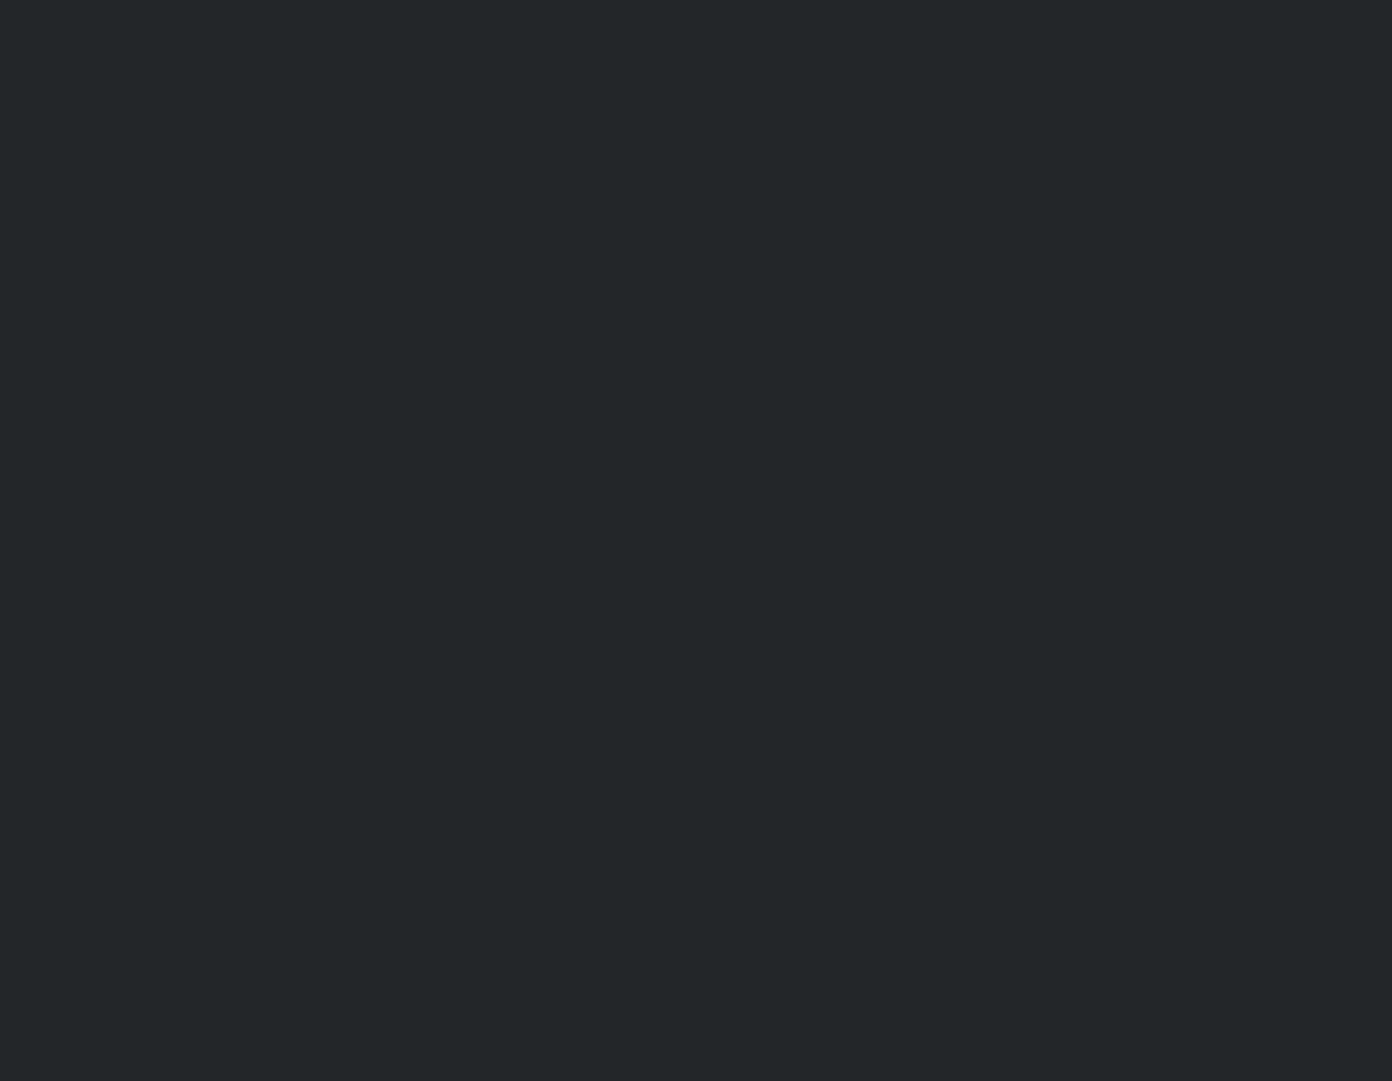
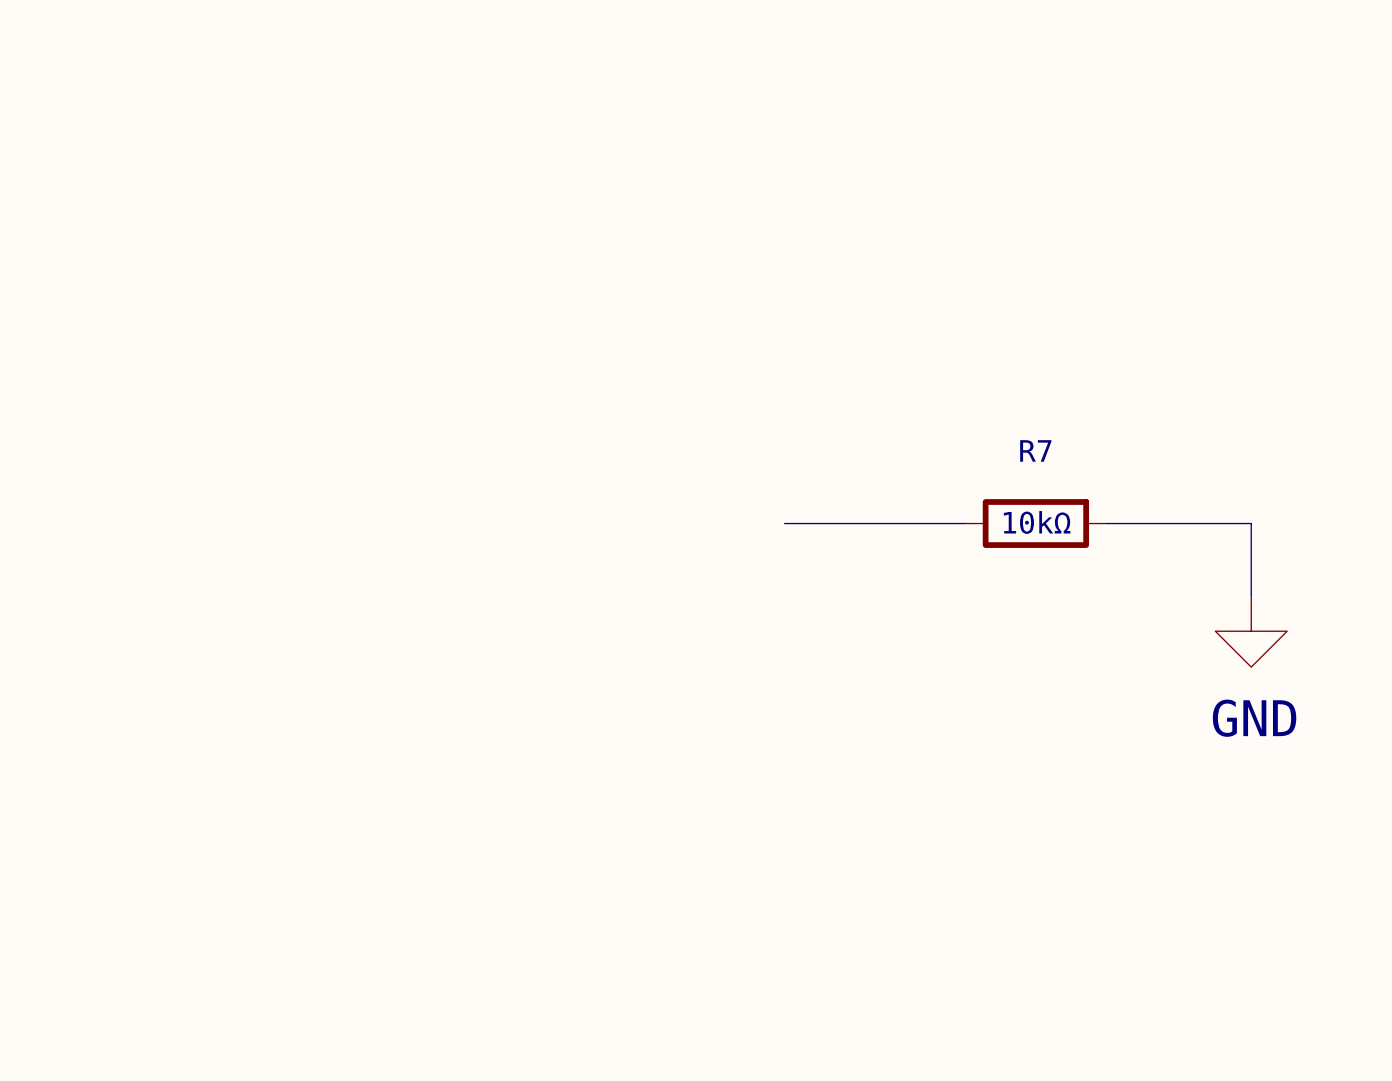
wire: none -> (784, 523) (964, 523)
R7: none -> 10kΩ (1035, 523)
wire: none -> (1107, 523) (1251, 523) (1251, 595)
power symbol: none -> GND (1251, 631)

